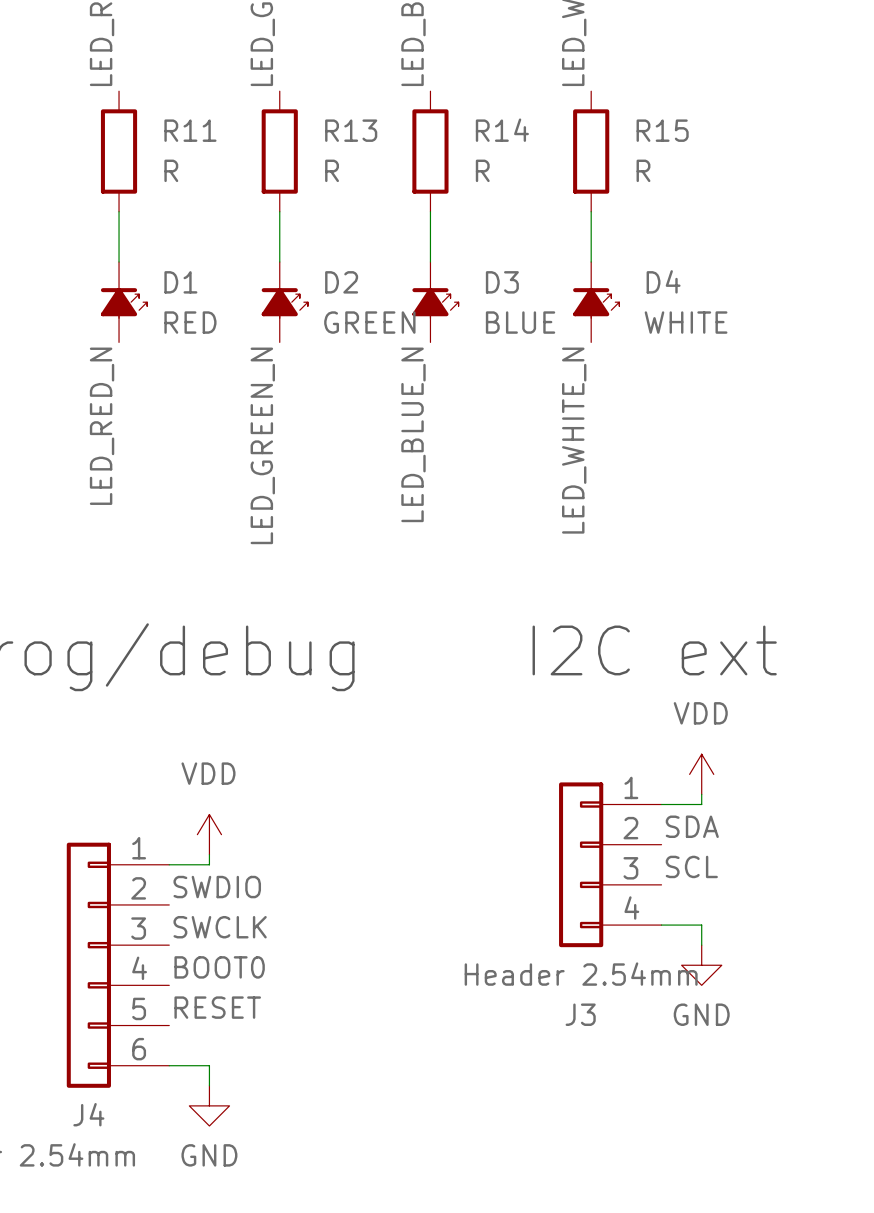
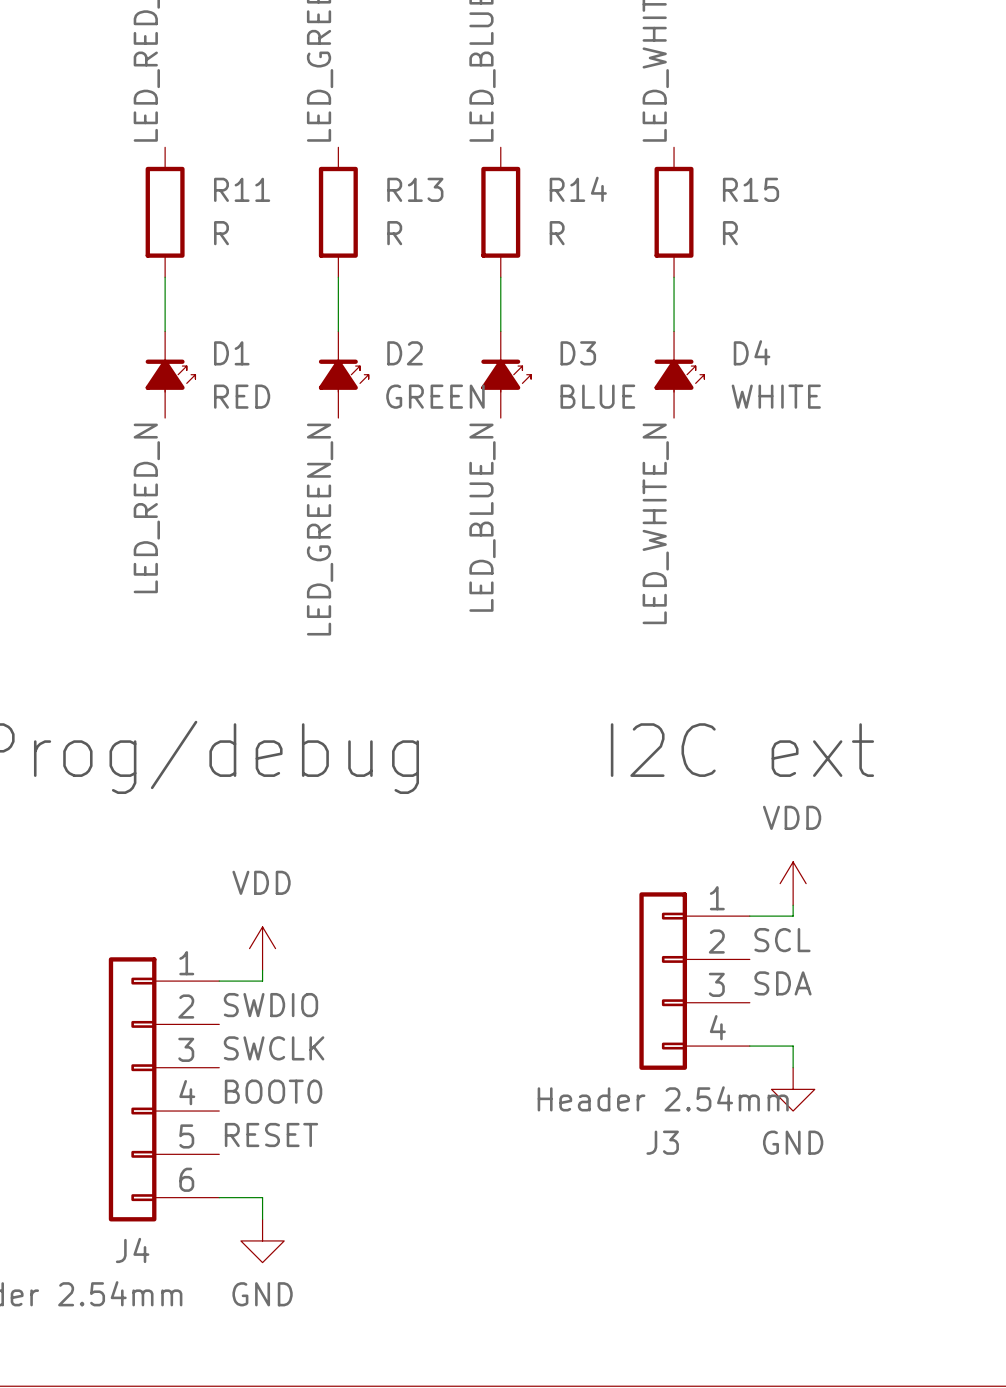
label: SDA (692, 826) -> SCL (782, 940)
label: SCL (691, 866) -> SDA (782, 983)

